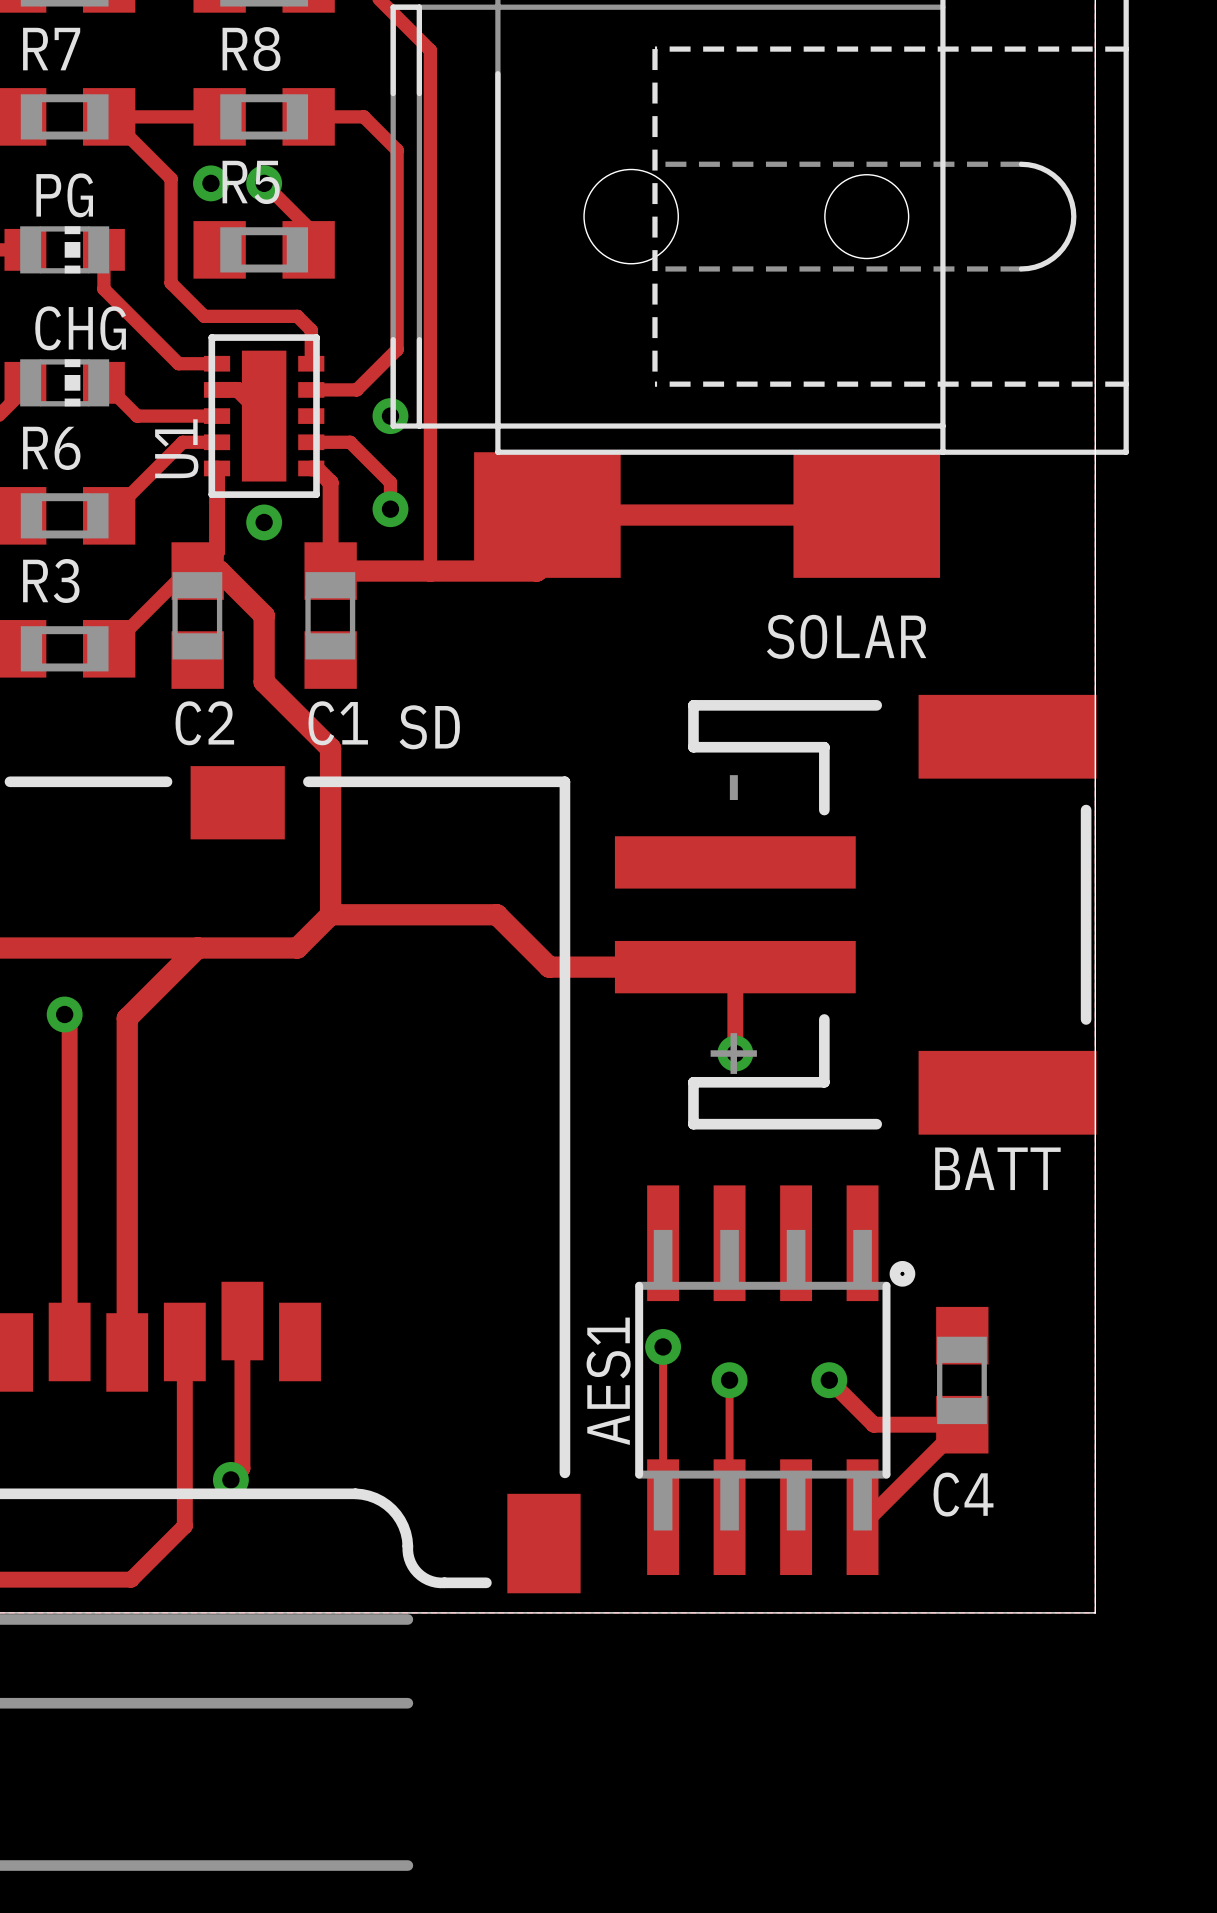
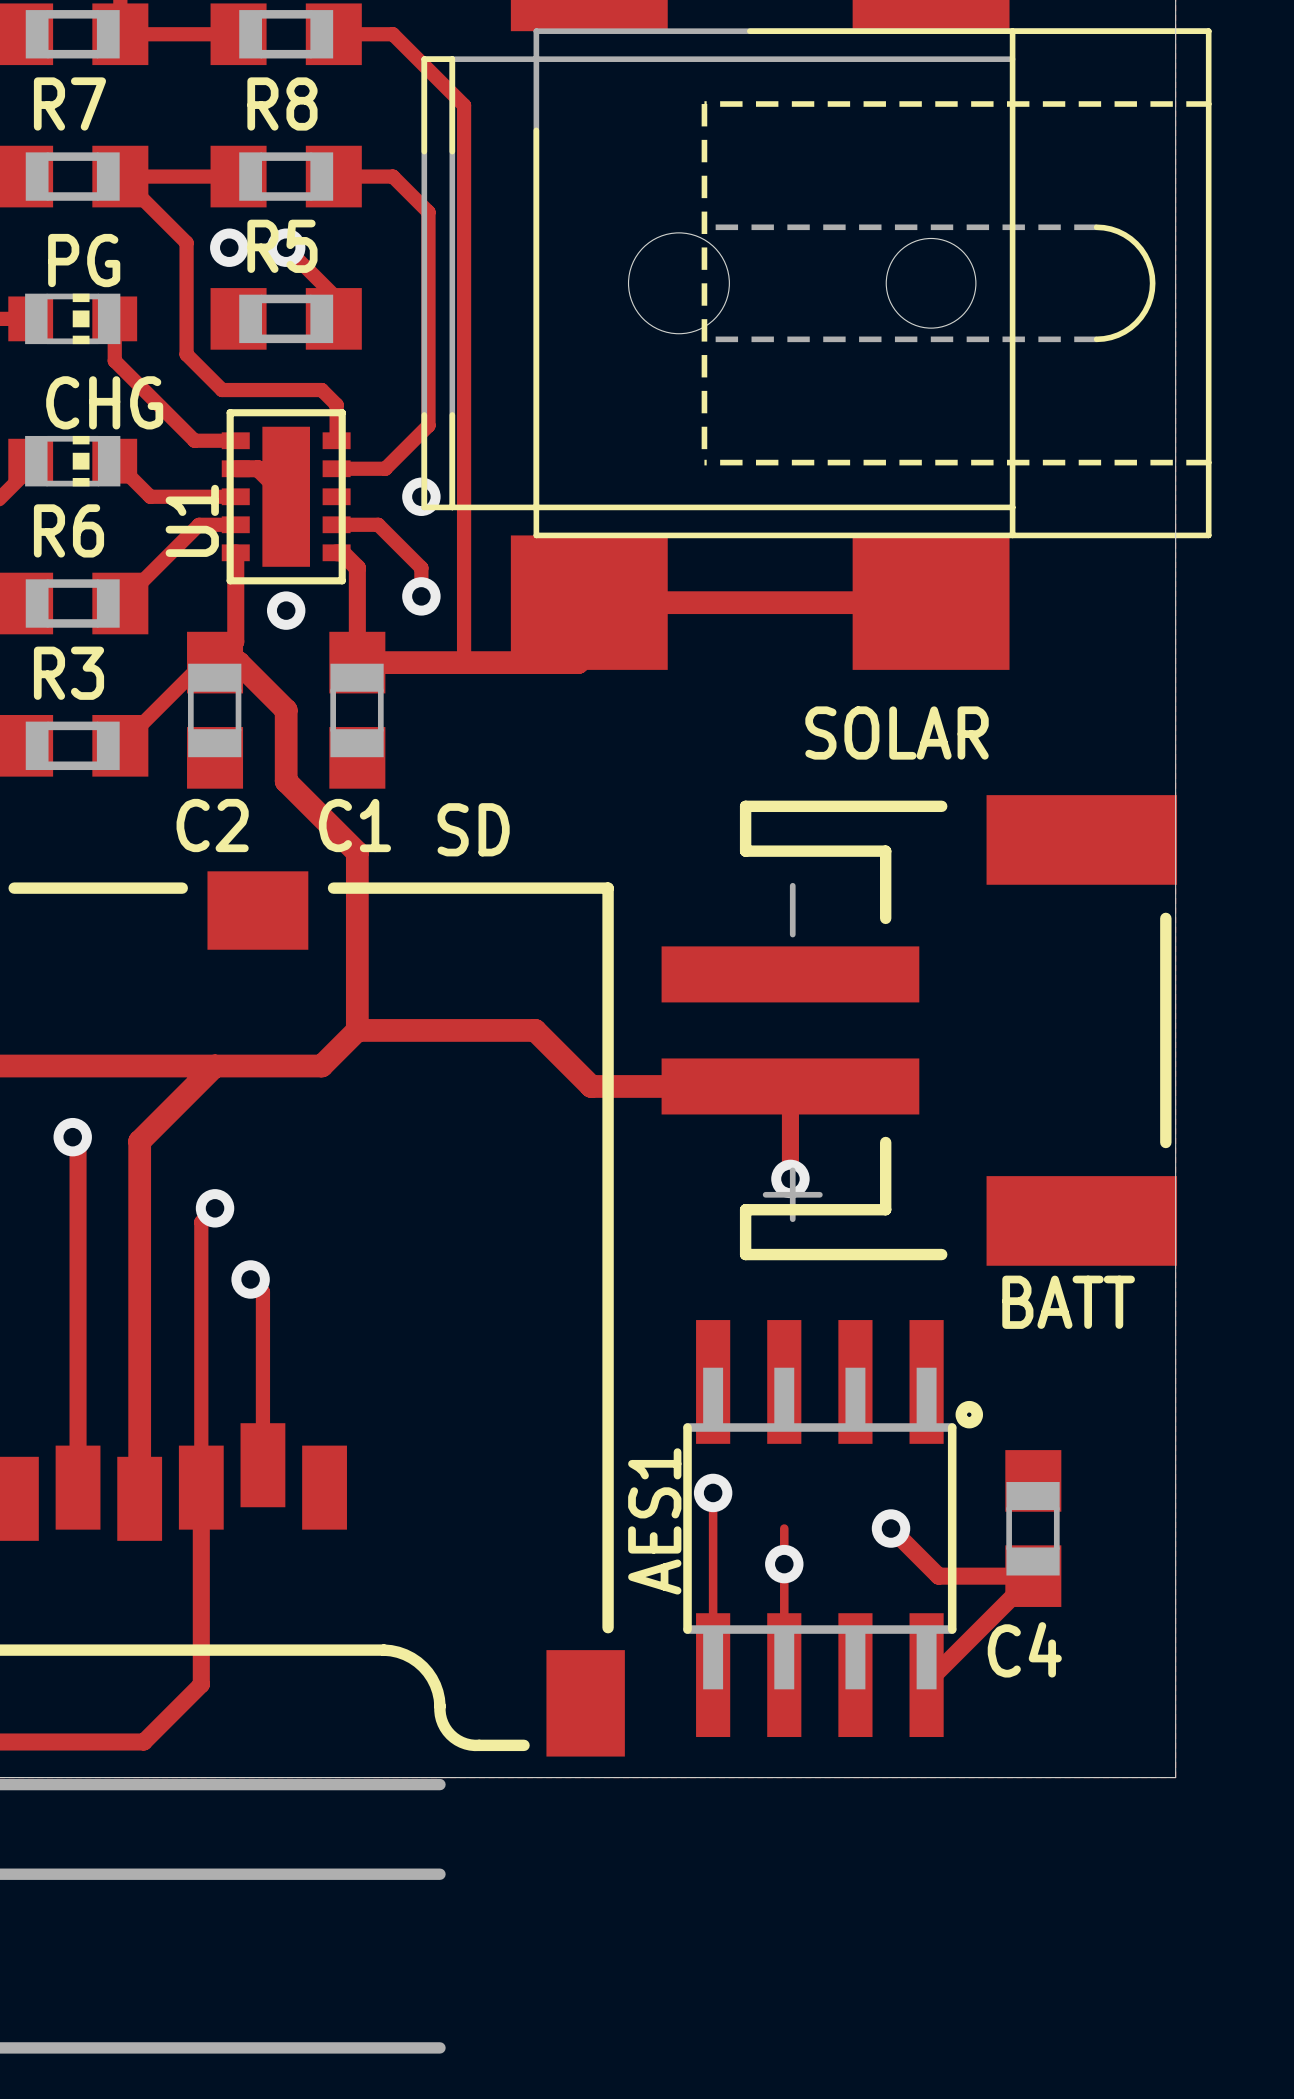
track: none -> (215, 1208) (201, 1222) (201, 1487)
via: none -> (215, 1208)
via: none -> (250, 1279)
track: (242, 1321) (242, 1468) (230, 1479) -> (262, 1465) (262, 1291) (250, 1279)
via position: (729, 1380) -> (784, 1564)
via: (230, 1479) -> none

